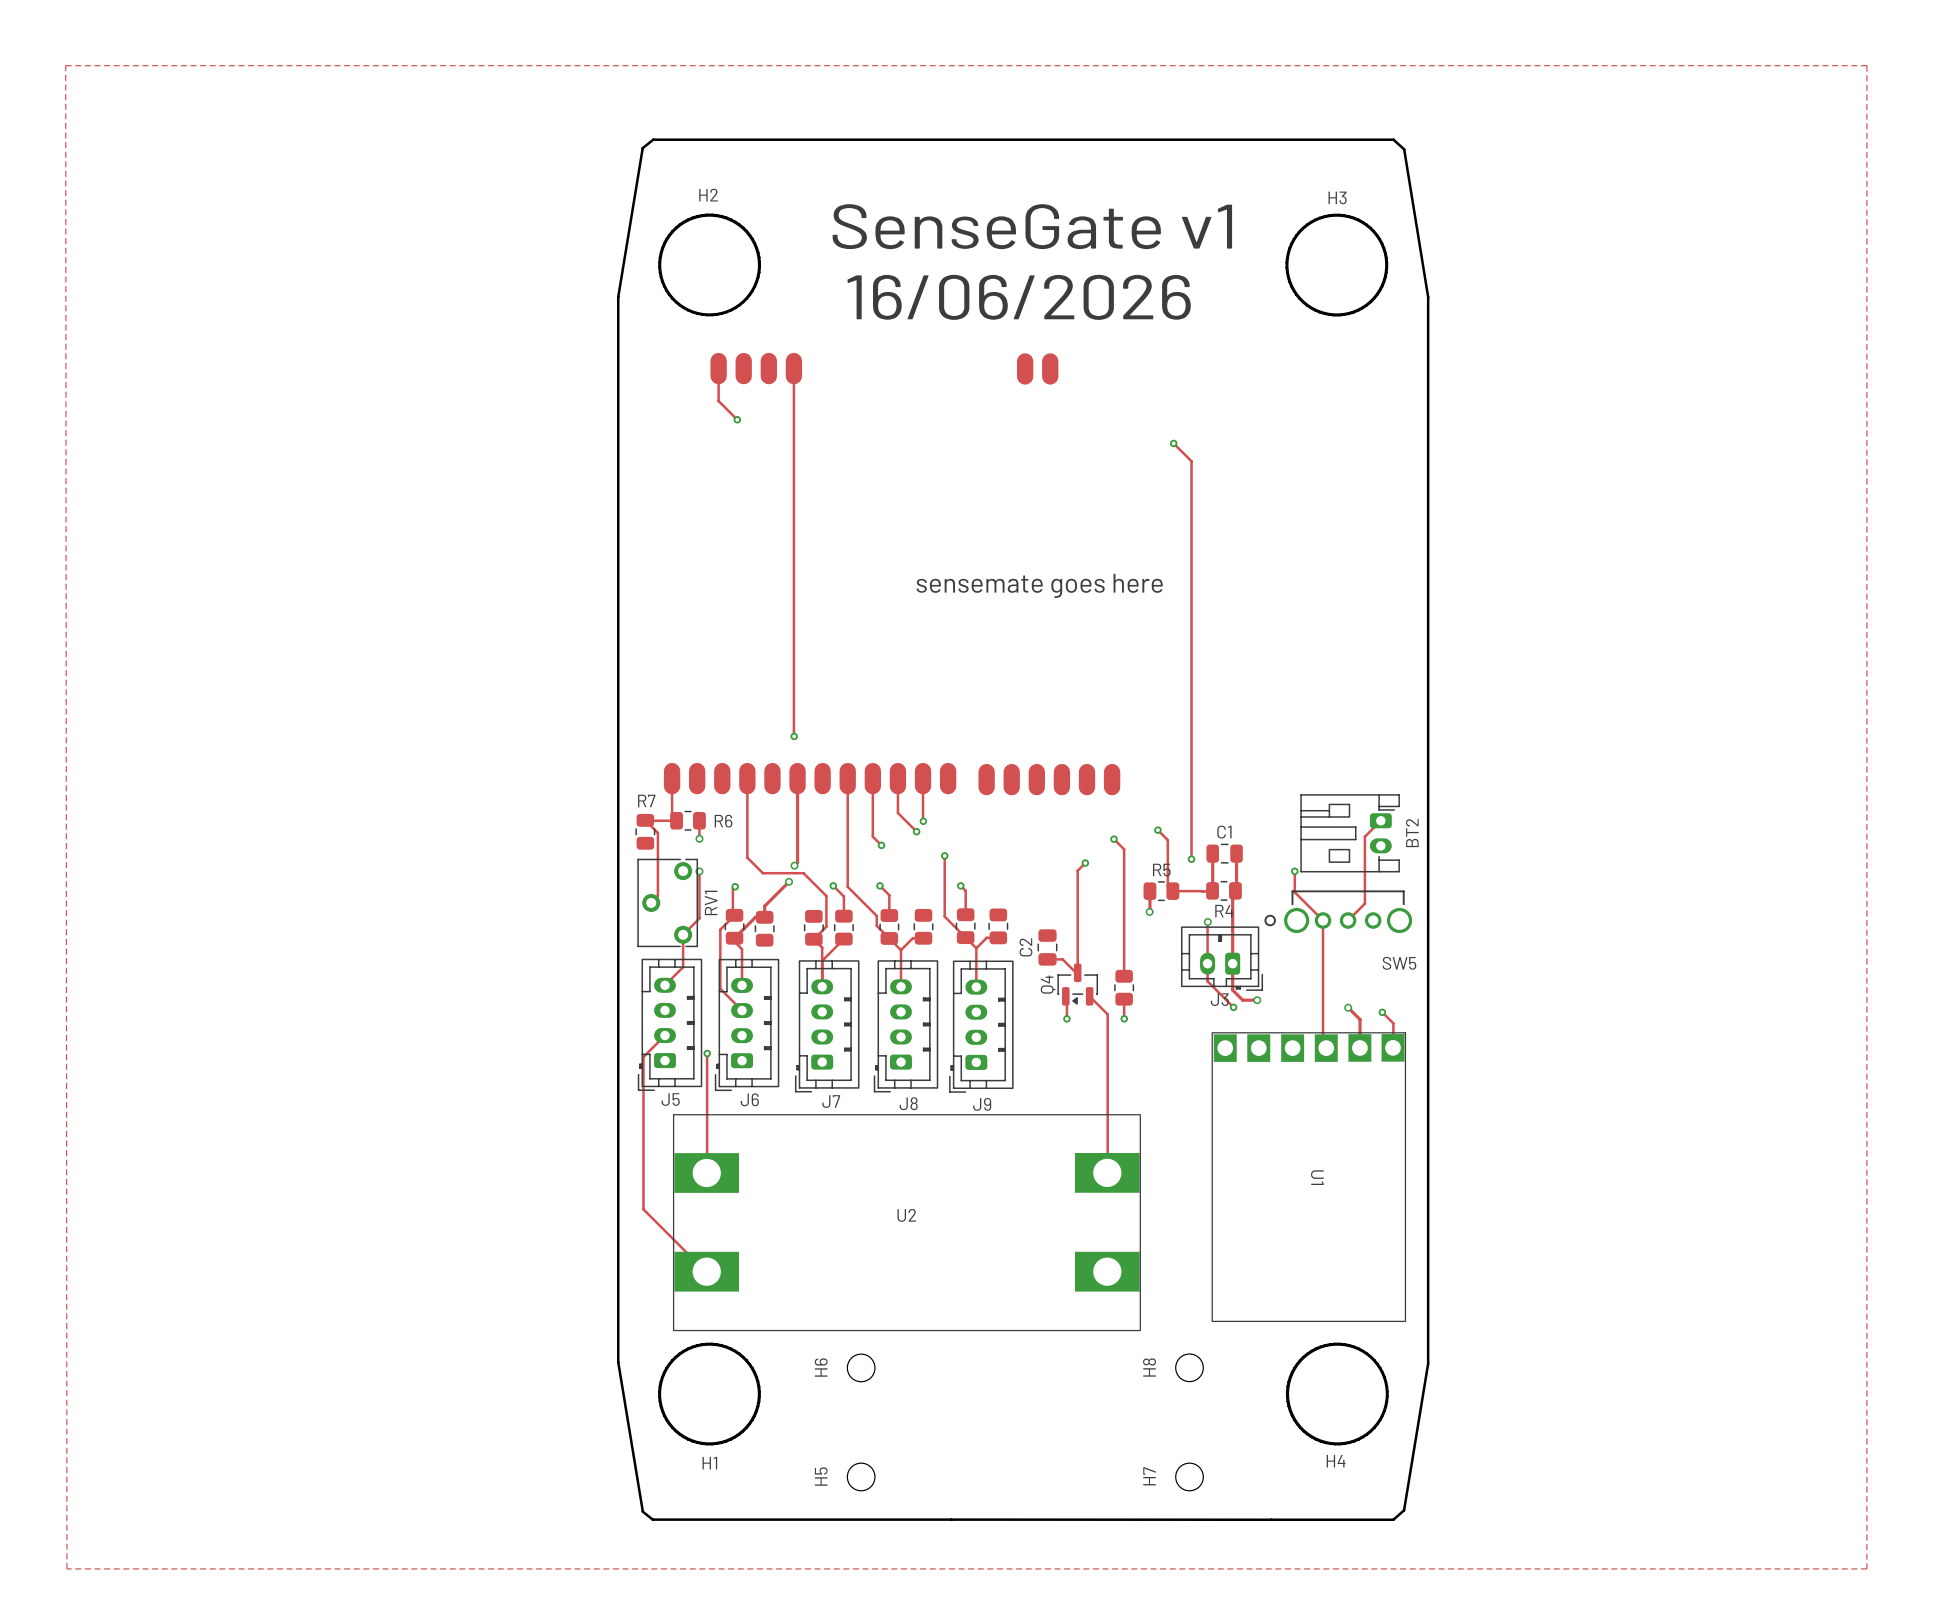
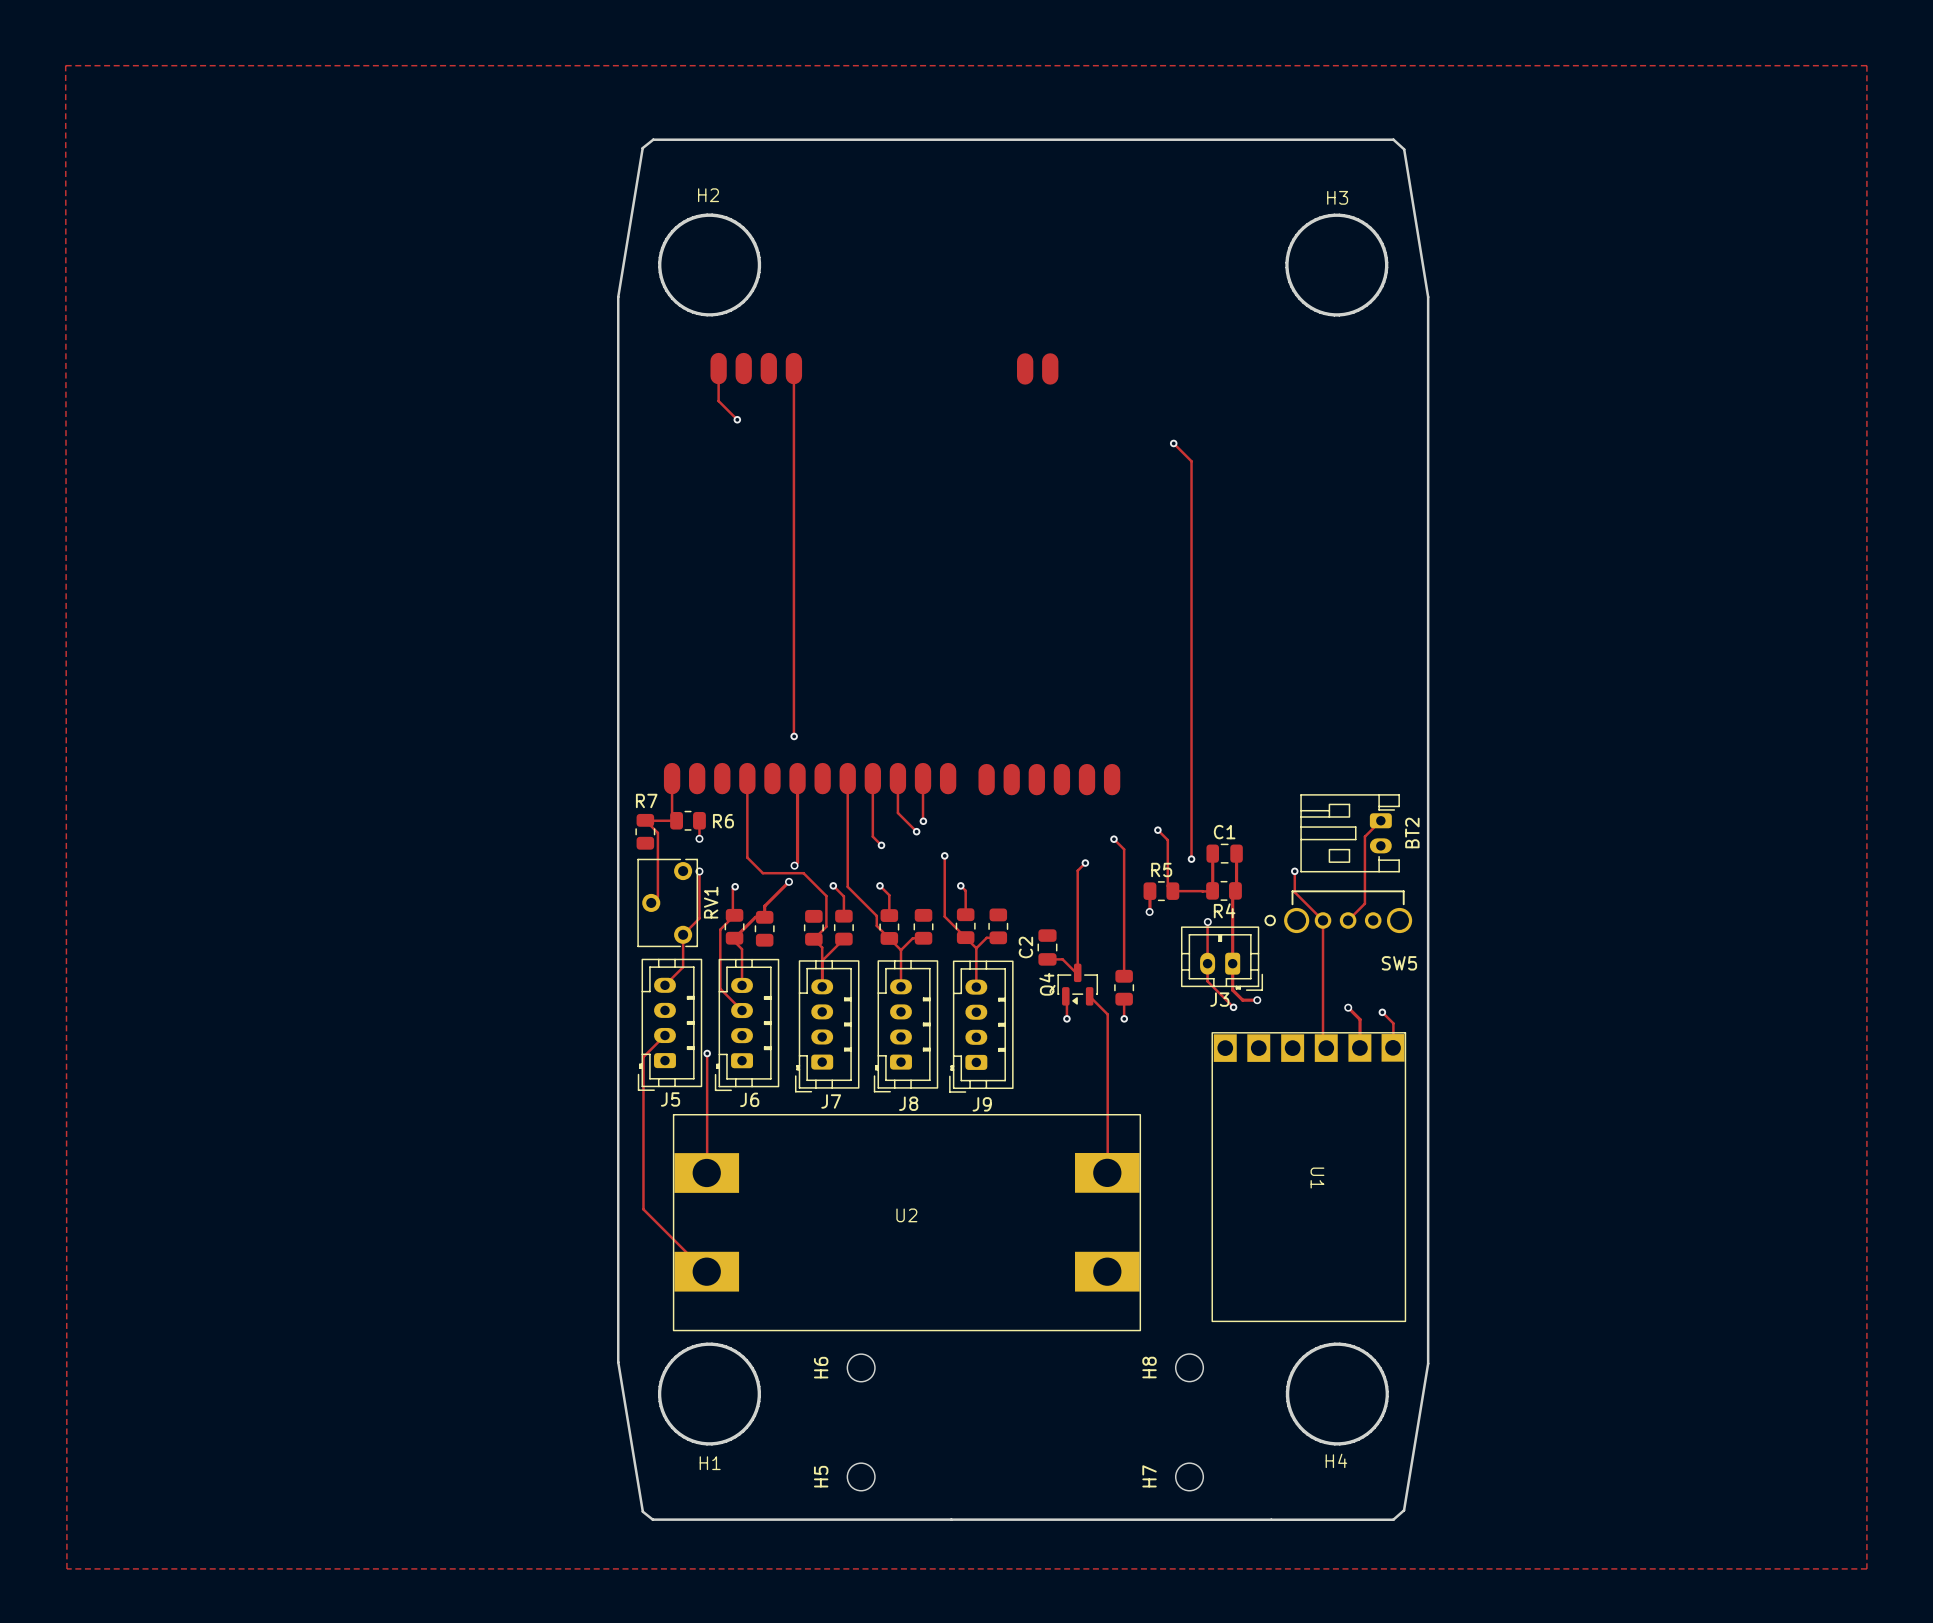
text: SenseGate v1 (1032, 226) -> none
text: 16/06/2026 (1019, 297) -> none
text: sensemate goes here (1039, 585) -> none

